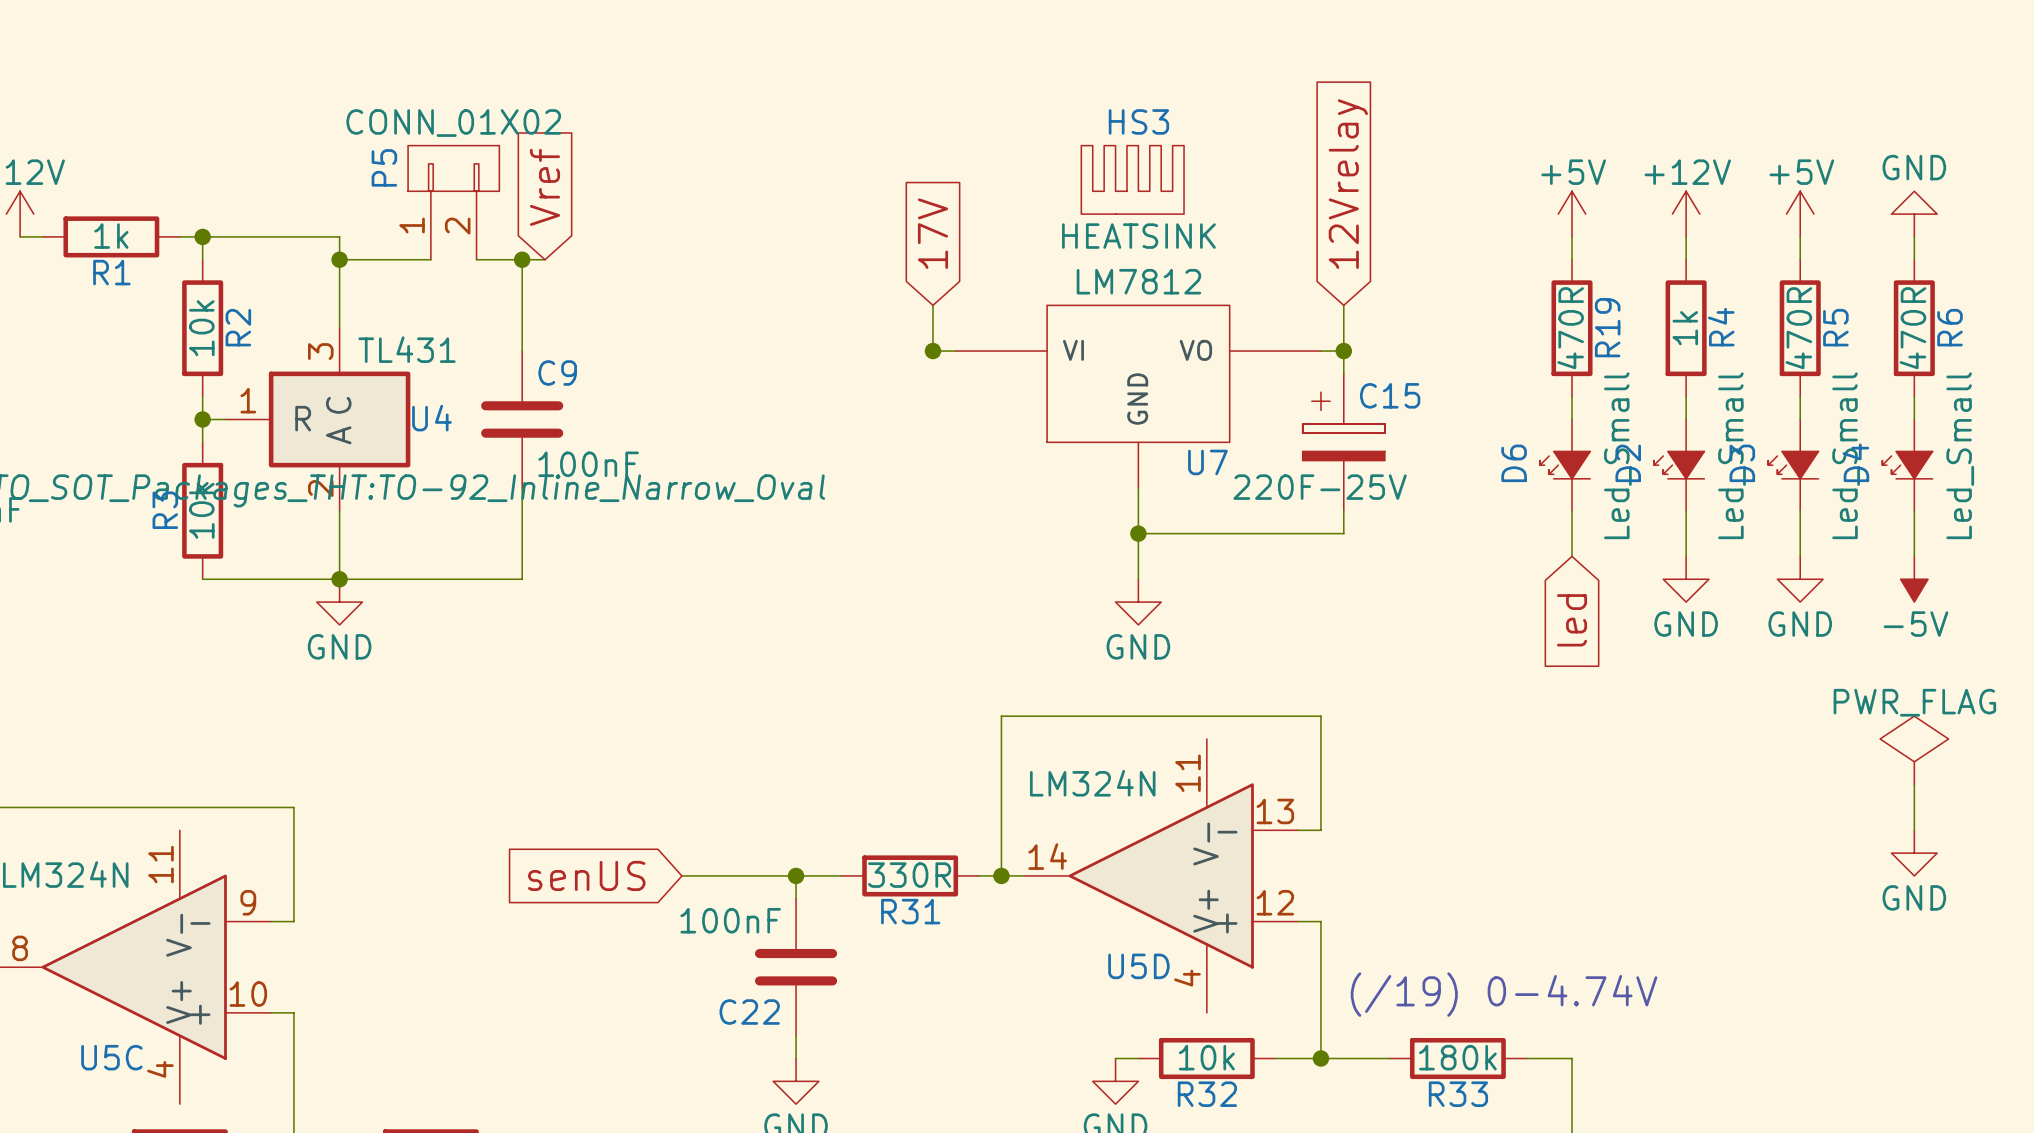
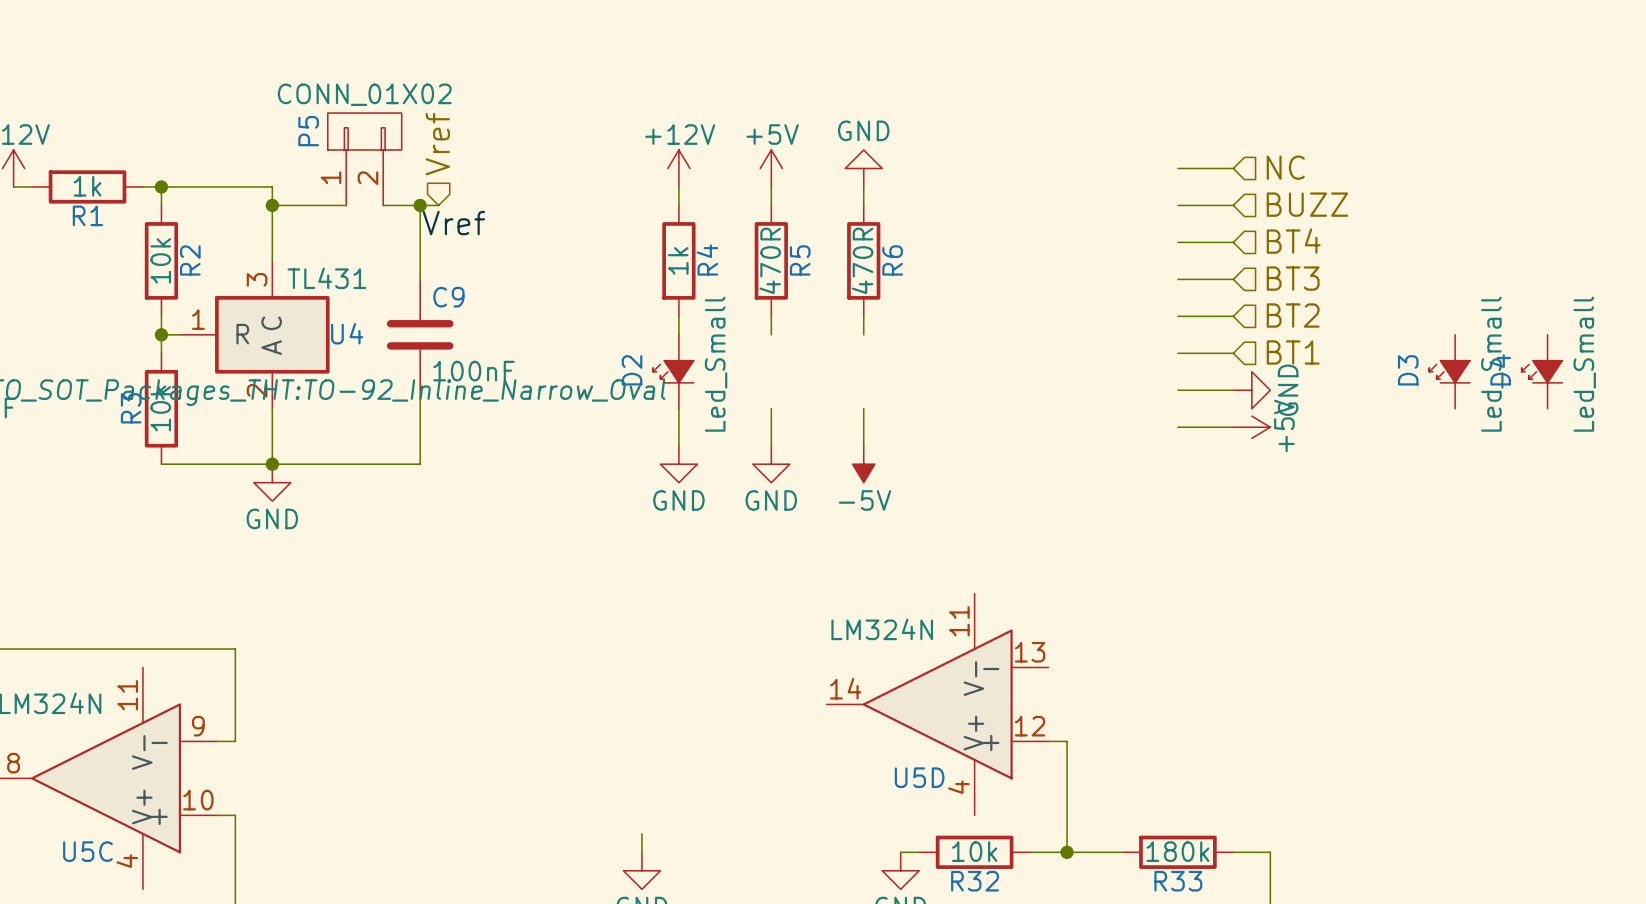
HS3: HEATSINK (1132, 179) -> none
hierarchical label: none -> Vref (437, 144)
global label: 12Vrelay (1348, 184) -> none
global label: Vref (545, 187) -> none
hierarchical label: none -> NC (1285, 167)
power symbol: none -> +12V (678, 168)
power symbol: none -> +5V (771, 168)
power symbol: none -> GND (863, 168)
wire: none -> (1177, 168) (1233, 168)
power symbol: +5V (1572, 214) -> none
power symbol: +12V (1686, 214) -> none
power symbol: +5V (1800, 214) -> none
power symbol: GND (1914, 214) -> none
global label: 17V (932, 233) -> none
wire: none -> (678, 186) (678, 205)
wire: none -> (771, 186) (771, 205)
wire: none -> (863, 186) (863, 205)
wire: (1572, 236) (1572, 259) -> none
wire: (1686, 236) (1686, 259) -> none
wire: (1800, 236) (1800, 259) -> none
wire: (1914, 236) (1914, 259) -> none
hierarchical label: none -> BUZZ (1307, 204)
wire: none -> (1177, 205) (1233, 205)
label: none -> Vref (453, 223)
hierarchical label: none -> BT4 (1293, 241)
wire: (932, 305) (932, 351) (955, 351) -> none
wire: (1343, 305) (1343, 373) -> none
wire: none -> (1177, 242) (1233, 242)
R19: 470R (1572, 328) -> none
R4 position: (1686, 328) -> (678, 260)
R5 position: (1800, 328) -> (771, 260)
R6 position: (1914, 328) -> (863, 260)
hierarchical label: none -> BT3 (1293, 278)
junction: (932, 351) -> none
wire: (1320, 351) (1343, 351) -> none
junction: (1343, 351) -> none
wire: none -> (1177, 279) (1233, 279)
hierarchical label: none -> BT2 (1293, 315)
wire: none -> (678, 316) (678, 334)
wire: none -> (771, 316) (771, 334)
wire: none -> (863, 316) (863, 334)
U7: LM7812 (1138, 396) -> none
wire: none -> (1177, 316) (1233, 316)
wire: (1572, 396) (1572, 419) -> none
wire: (1686, 396) (1686, 419) -> none
wire: (1800, 396) (1800, 419) -> none
wire: (1914, 396) (1914, 419) -> none
hierarchical label: none -> BT1 (1293, 352)
C15: 220F-25V (1343, 442) -> none
wire: none -> (1177, 353) (1233, 353)
D6: Led_Small (1565, 465) -> none
D2 position: (1679, 465) -> (673, 371)
wire: (1138, 487) (1138, 579) -> none
wire: none -> (1177, 390) (1233, 390)
power symbol: none -> GND (1251, 390)
wire: none -> (678, 408) (678, 445)
wire: none -> (771, 408) (771, 445)
wire: none -> (863, 408) (863, 445)
wire: (1343, 510) (1343, 533) (1138, 533) -> none
wire: (1572, 510) (1572, 556) -> none
wire: (1686, 510) (1686, 556) -> none
wire: (1800, 510) (1800, 556) -> none
wire: (1914, 510) (1914, 556) -> none
junction: (1138, 533) -> none
wire: none -> (1177, 427) (1233, 427)
power symbol: none -> +5V (1251, 427)
power symbol: none -> GND (678, 464)
power symbol: none -> GND (771, 464)
power symbol: none -> -5V (863, 464)
power symbol: GND (1686, 579) -> none
power symbol: GND (1800, 579) -> none
power symbol: -5V (1914, 579) -> none
power symbol: GND (1138, 602) -> none
global label: led (1572, 620) -> none
power symbol: PWR_FLAG (1914, 750) -> none
wire: (1914, 784) (1914, 830) -> none
wire: (1298, 830) (1320, 830) (1320, 716) (1001, 716) (1001, 875) -> none
power symbol: GND (1914, 853) -> none
global label: senUS (586, 875) -> none
wire: (681, 875) (841, 875) -> none
wire: (796, 875) (796, 898) -> none
junction: (796, 875) -> none
R31: 330R (910, 875) -> none
wire: (978, 875) (1024, 875) -> none
junction: (1001, 875) -> none
C22: 100nF (796, 967) -> none
text: (/19) 0-4.74V (1504, 994) -> none

